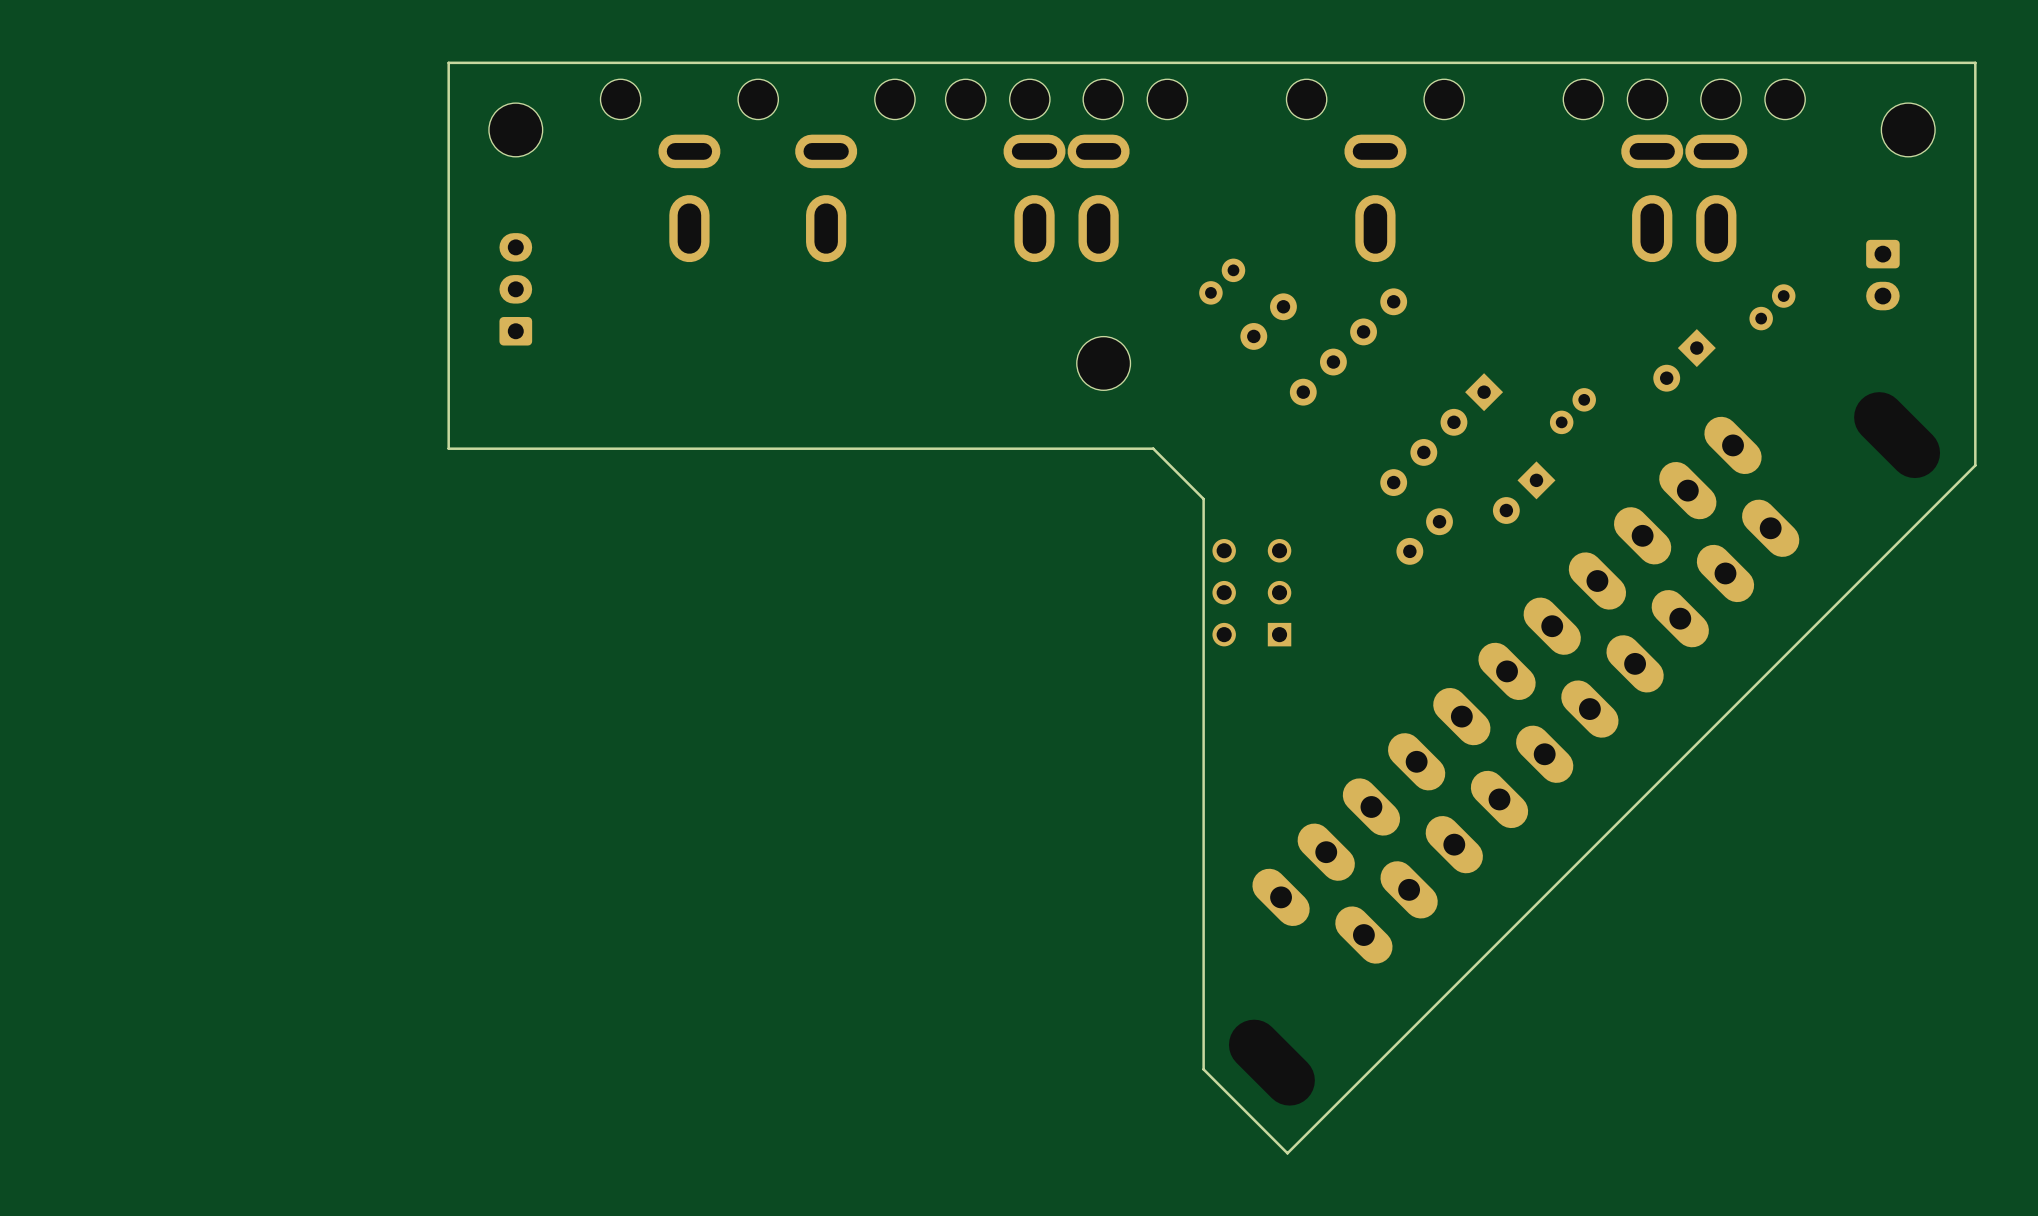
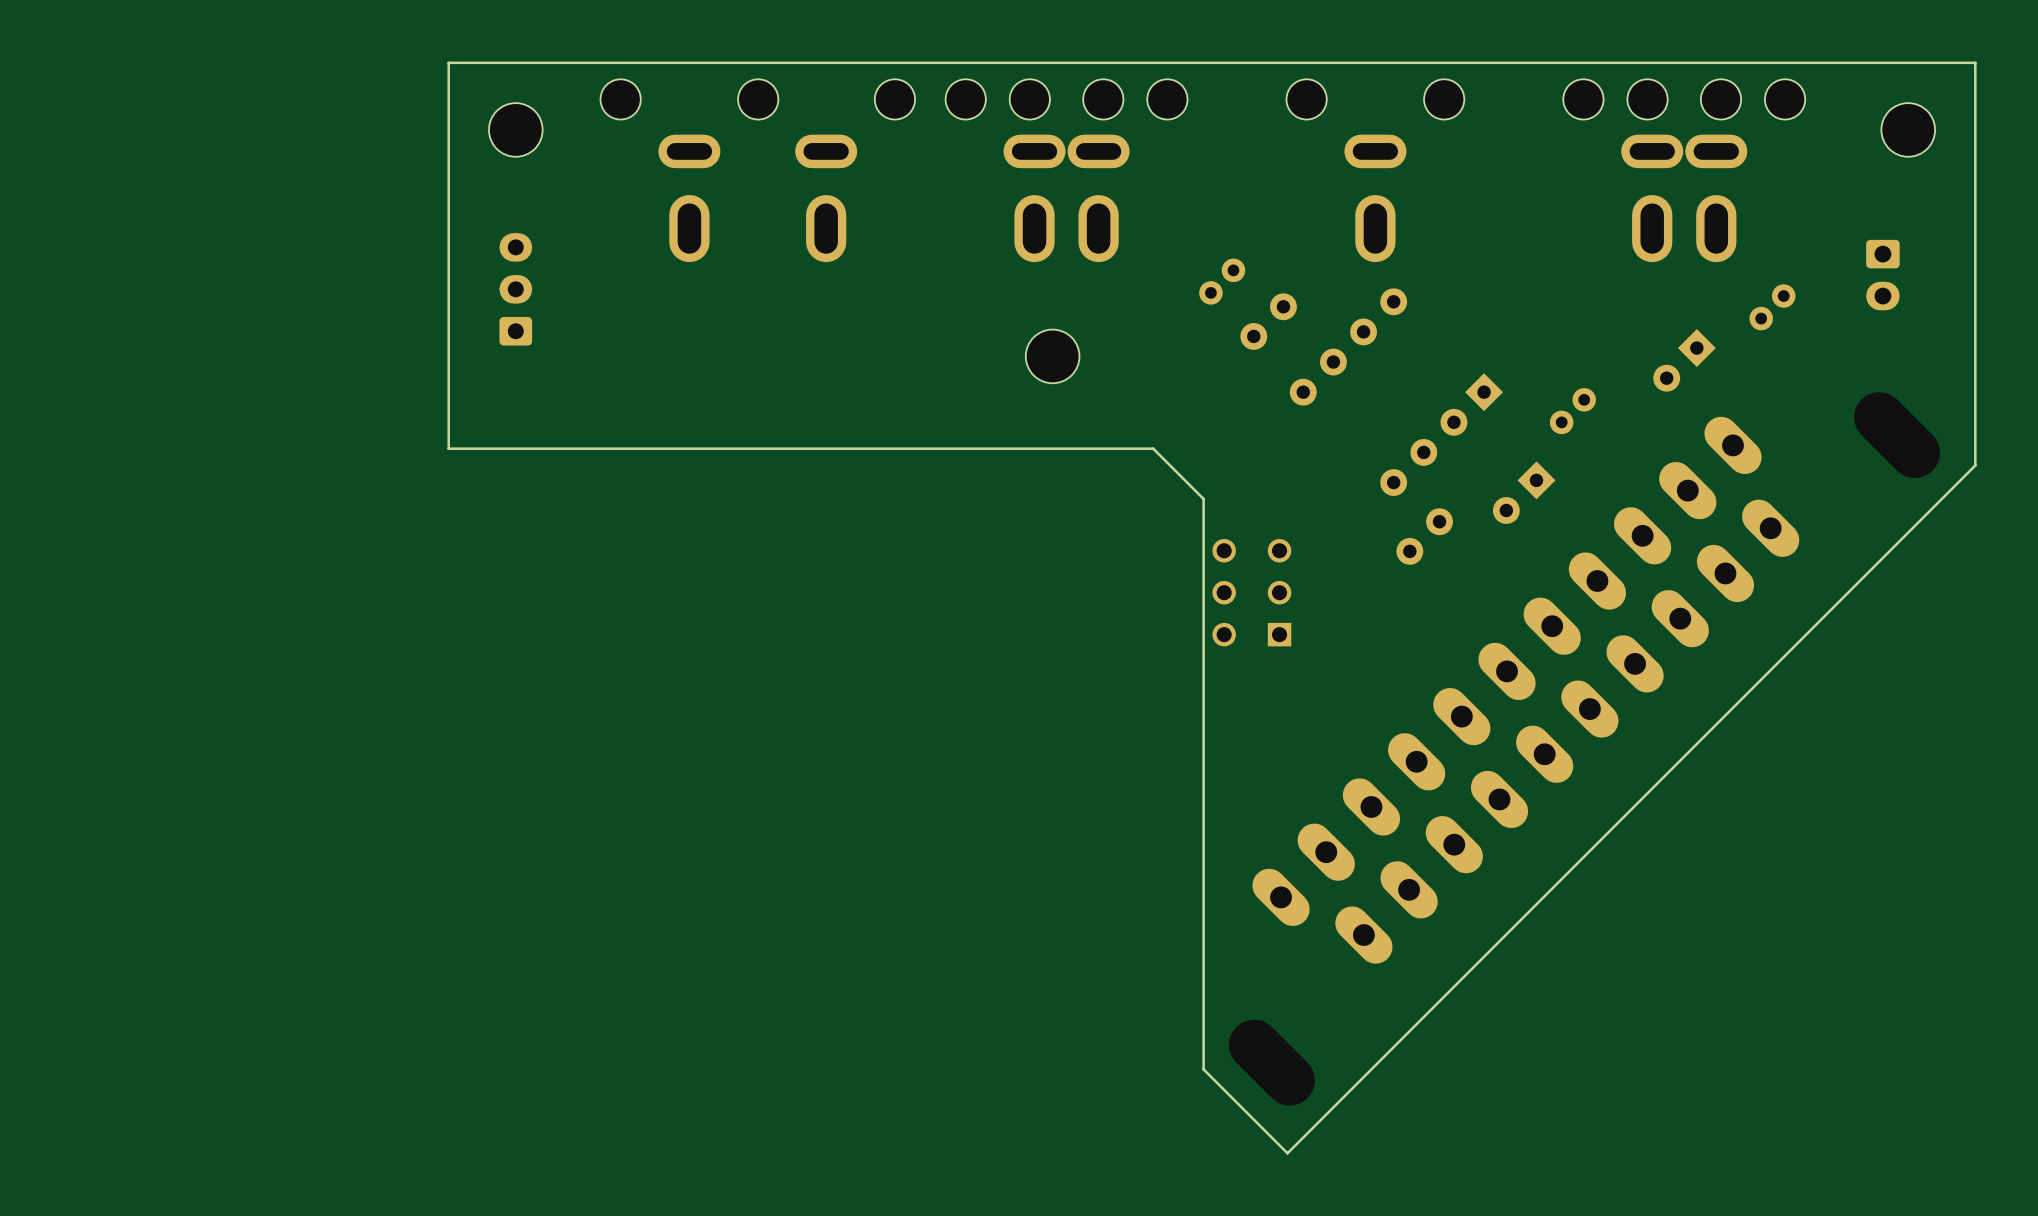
part position: (1103, 363) -> (1052, 356)

